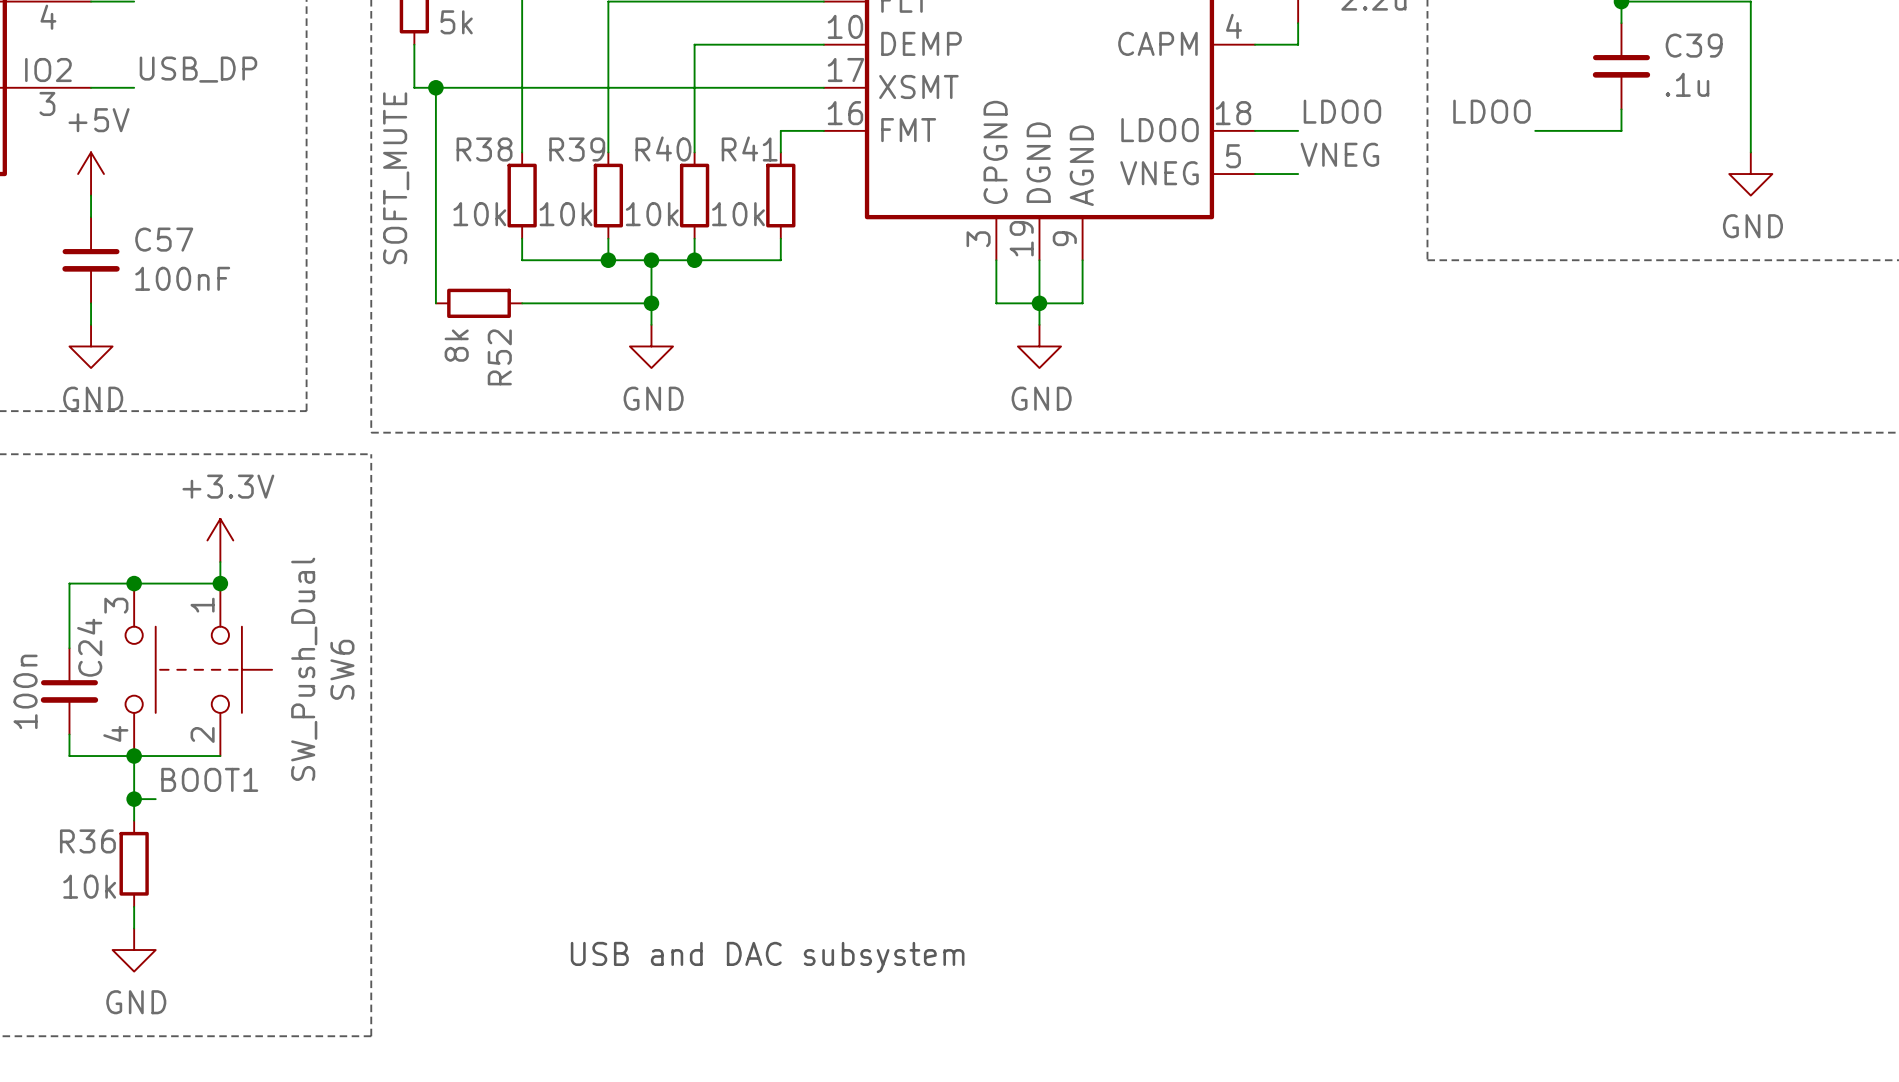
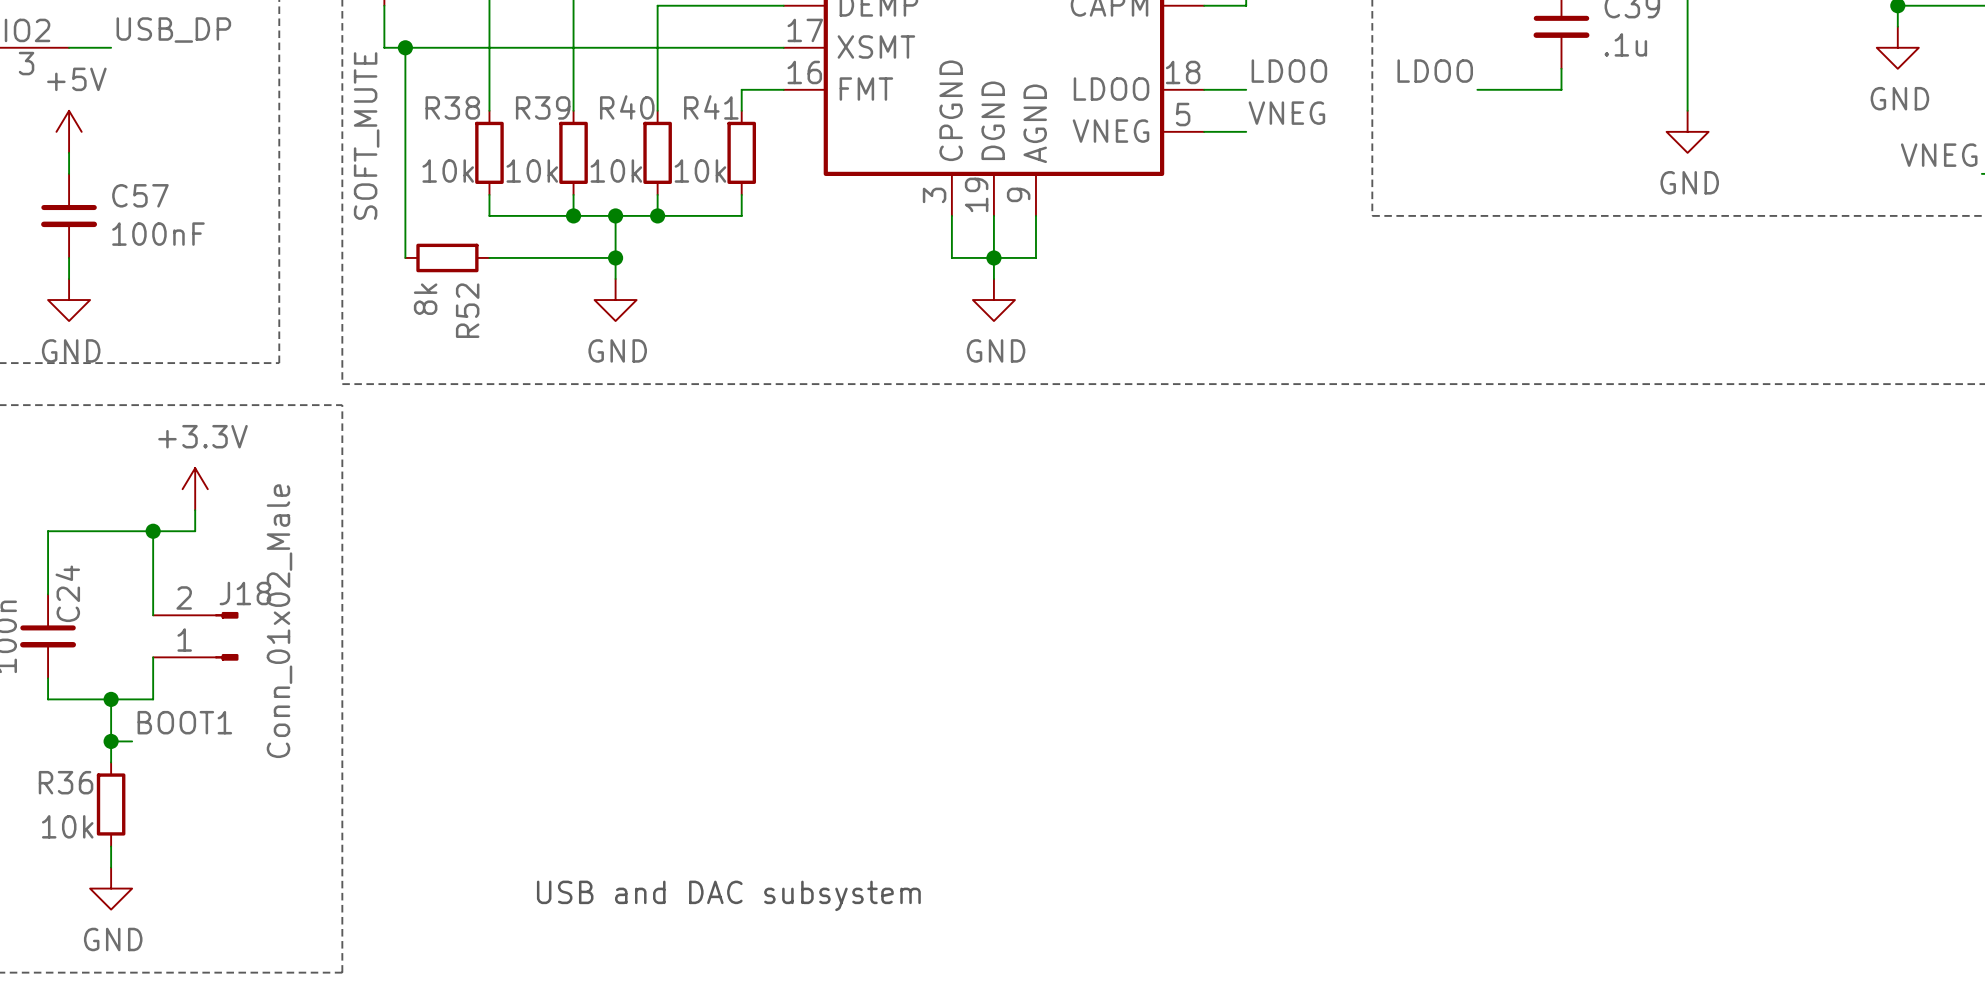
junction: (134, 583) -> none
wire: none -> (153, 531) (153, 615)
junction: none -> (153, 531)
junction: (220, 583) -> none
SW6: SW_Push_Dual (198, 669) -> none
J18: none -> Conn_01x02_Male (195, 636)
wire: (177, 756) (220, 756) -> (153, 699) (153, 657)

